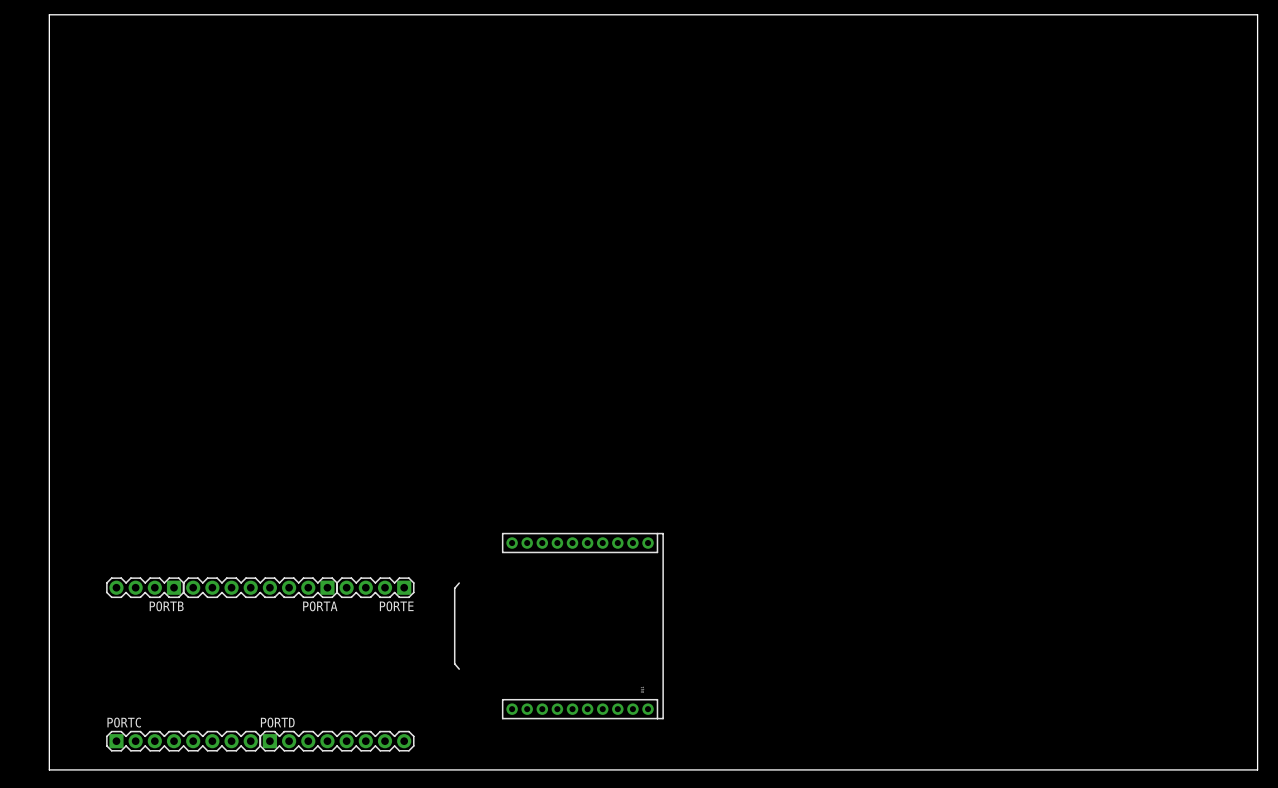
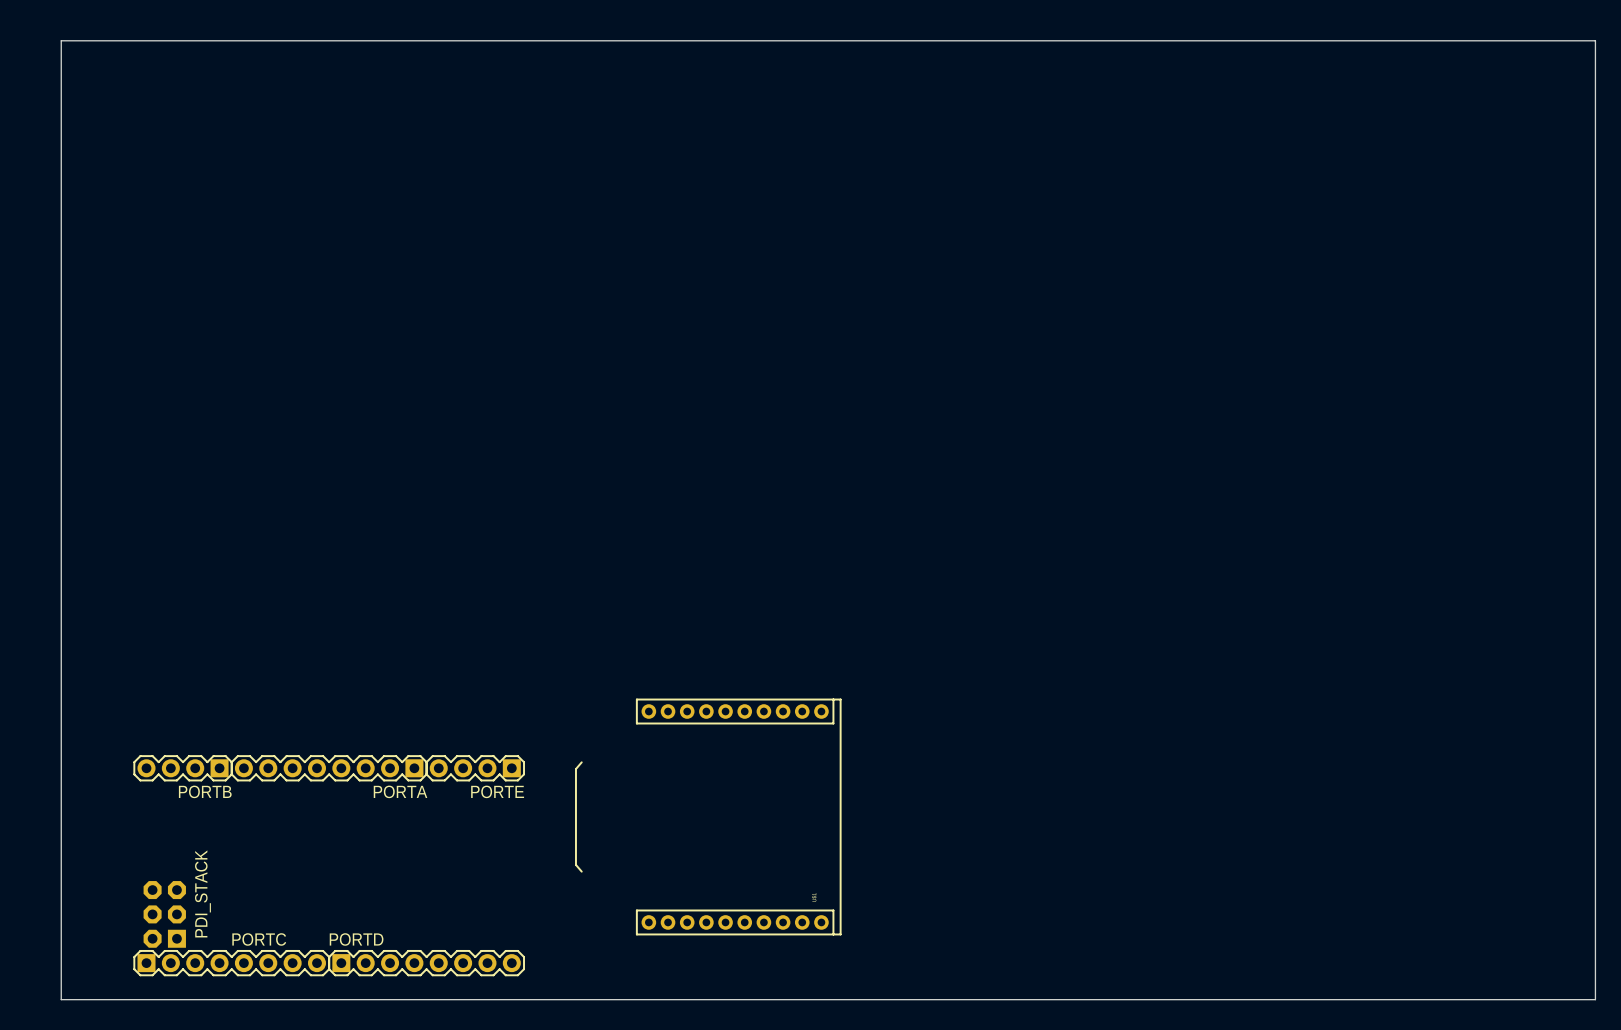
PDI_STACK: none -> (164, 914)
PORTC name position: PORTC (124, 722) -> PORTC (259, 939)

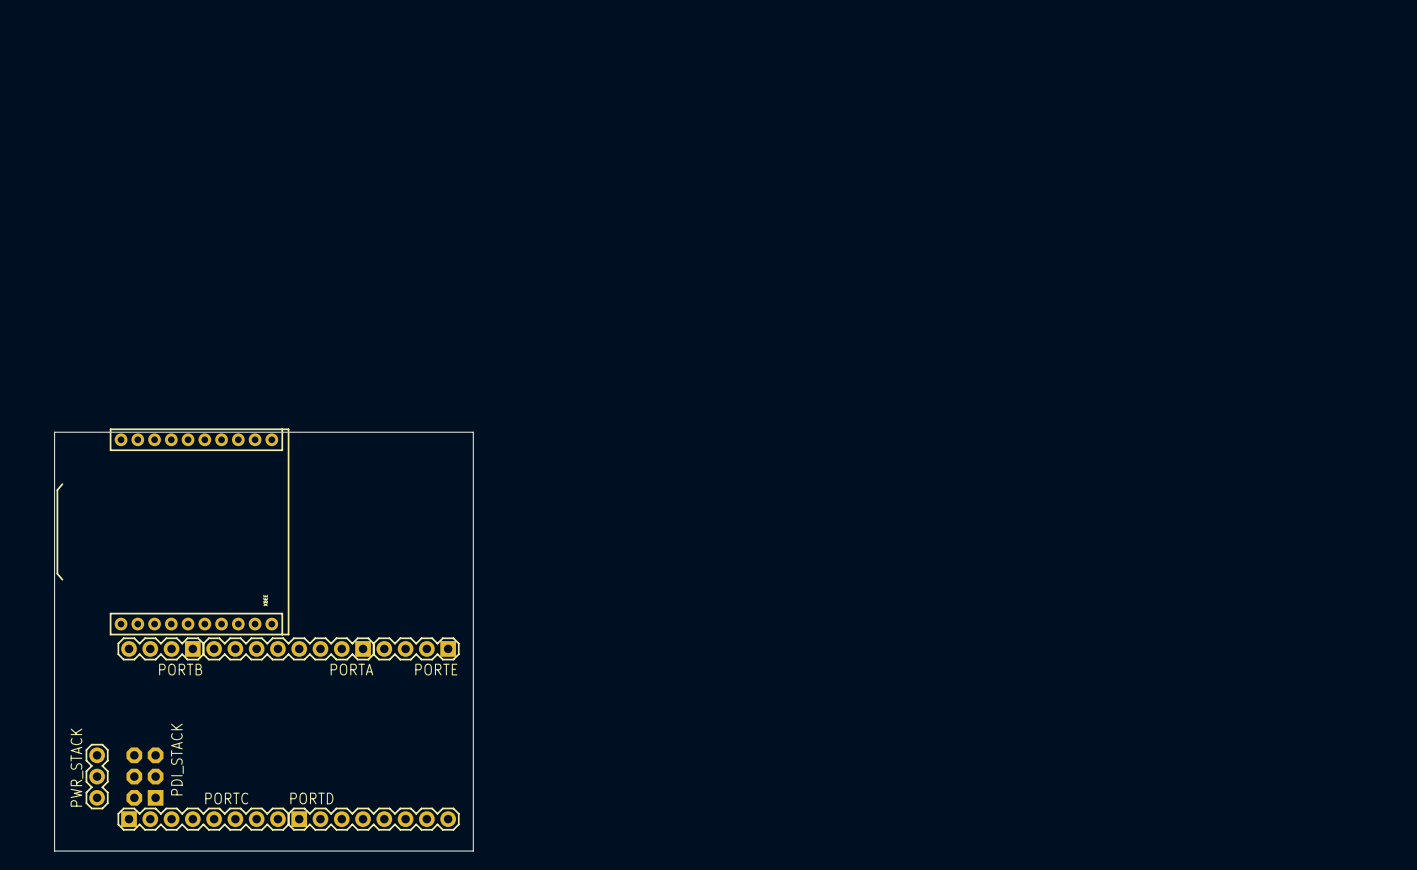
board edge: (61, 520) (61, 40) (1595, 40) (1595, 999) (540, 999) -> (54, 432) (473, 432) (473, 851)
part: none -> (172, 531)
part: (708, 816) -> none
PWR_STACK: none -> (97, 776)

